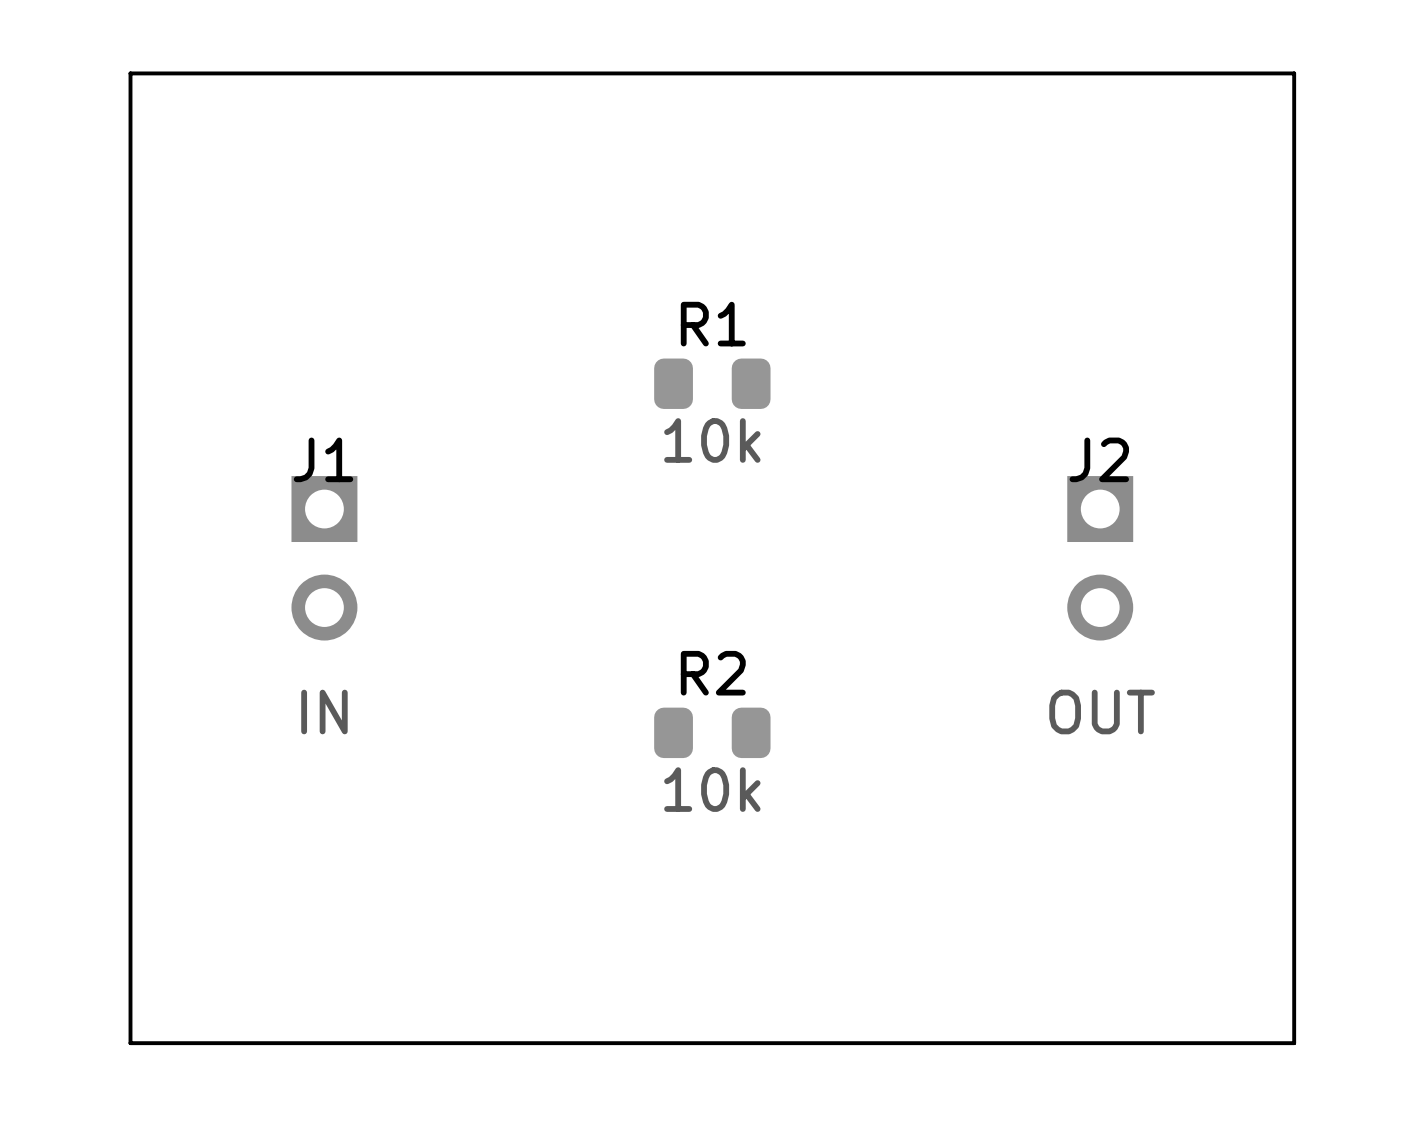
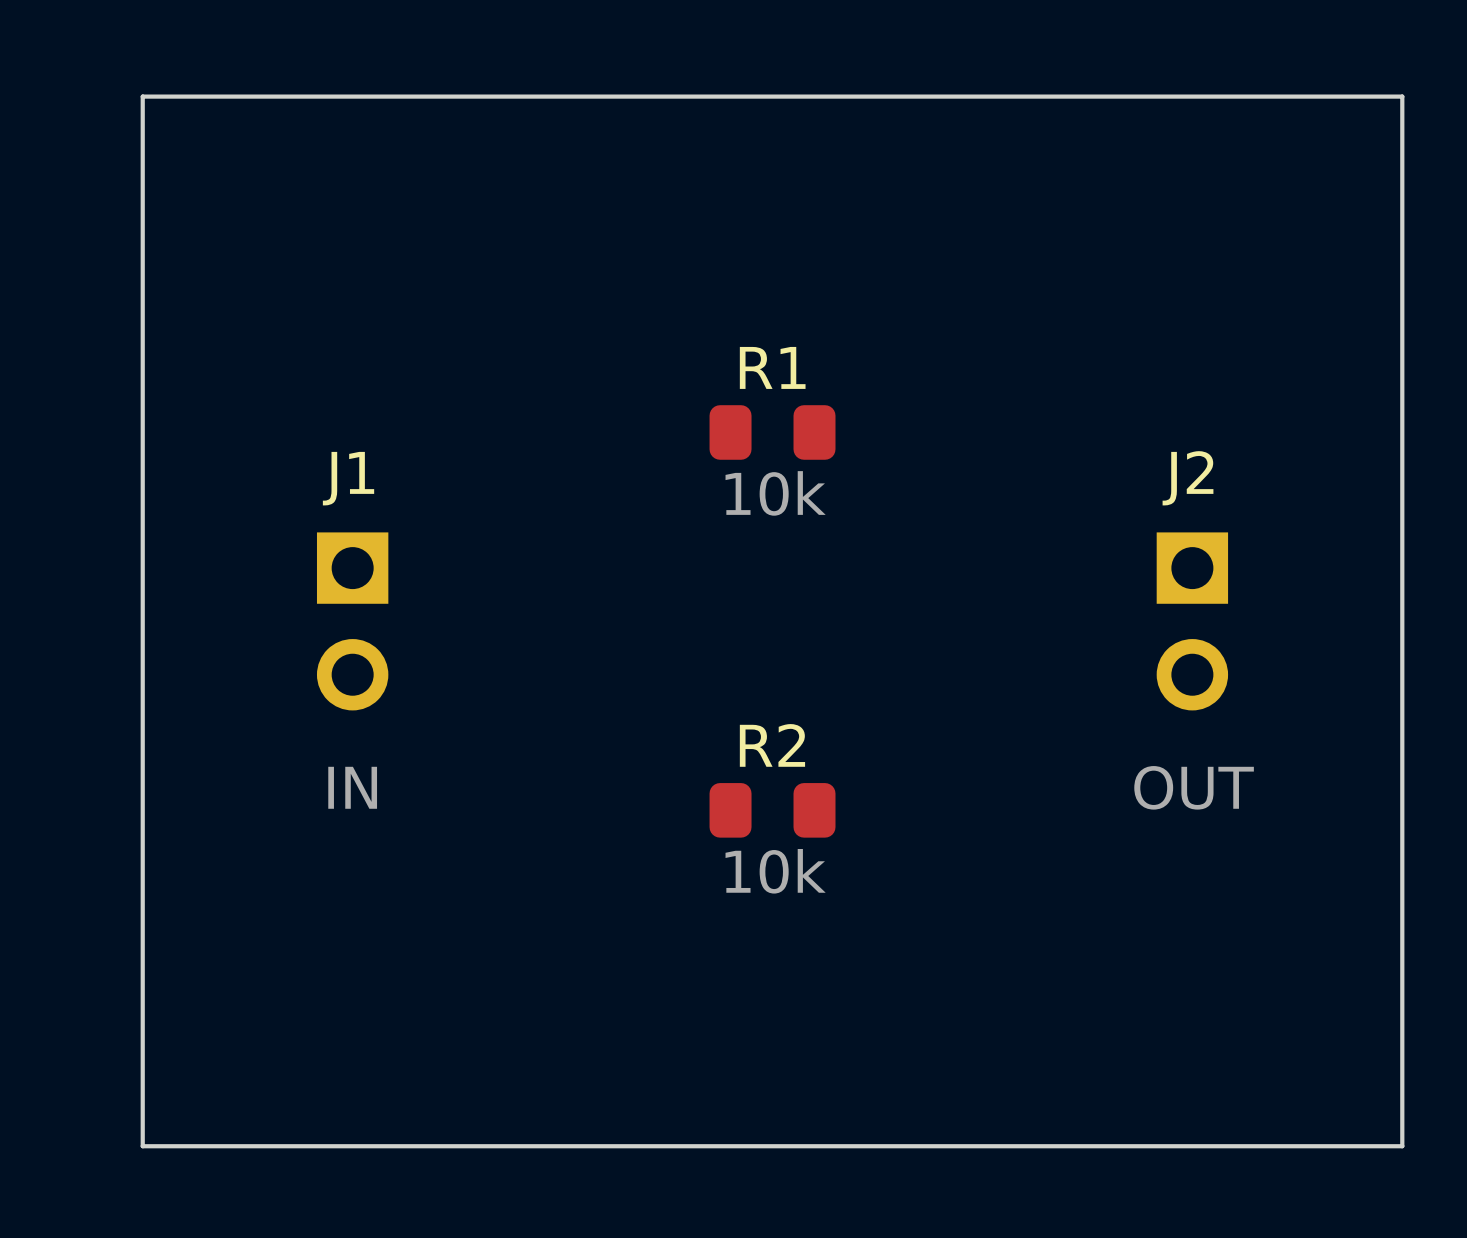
J1 name position: J1 (323, 459) -> J1 (348, 478)
J2 name position: J2 (1099, 459) -> J2 (1188, 478)

